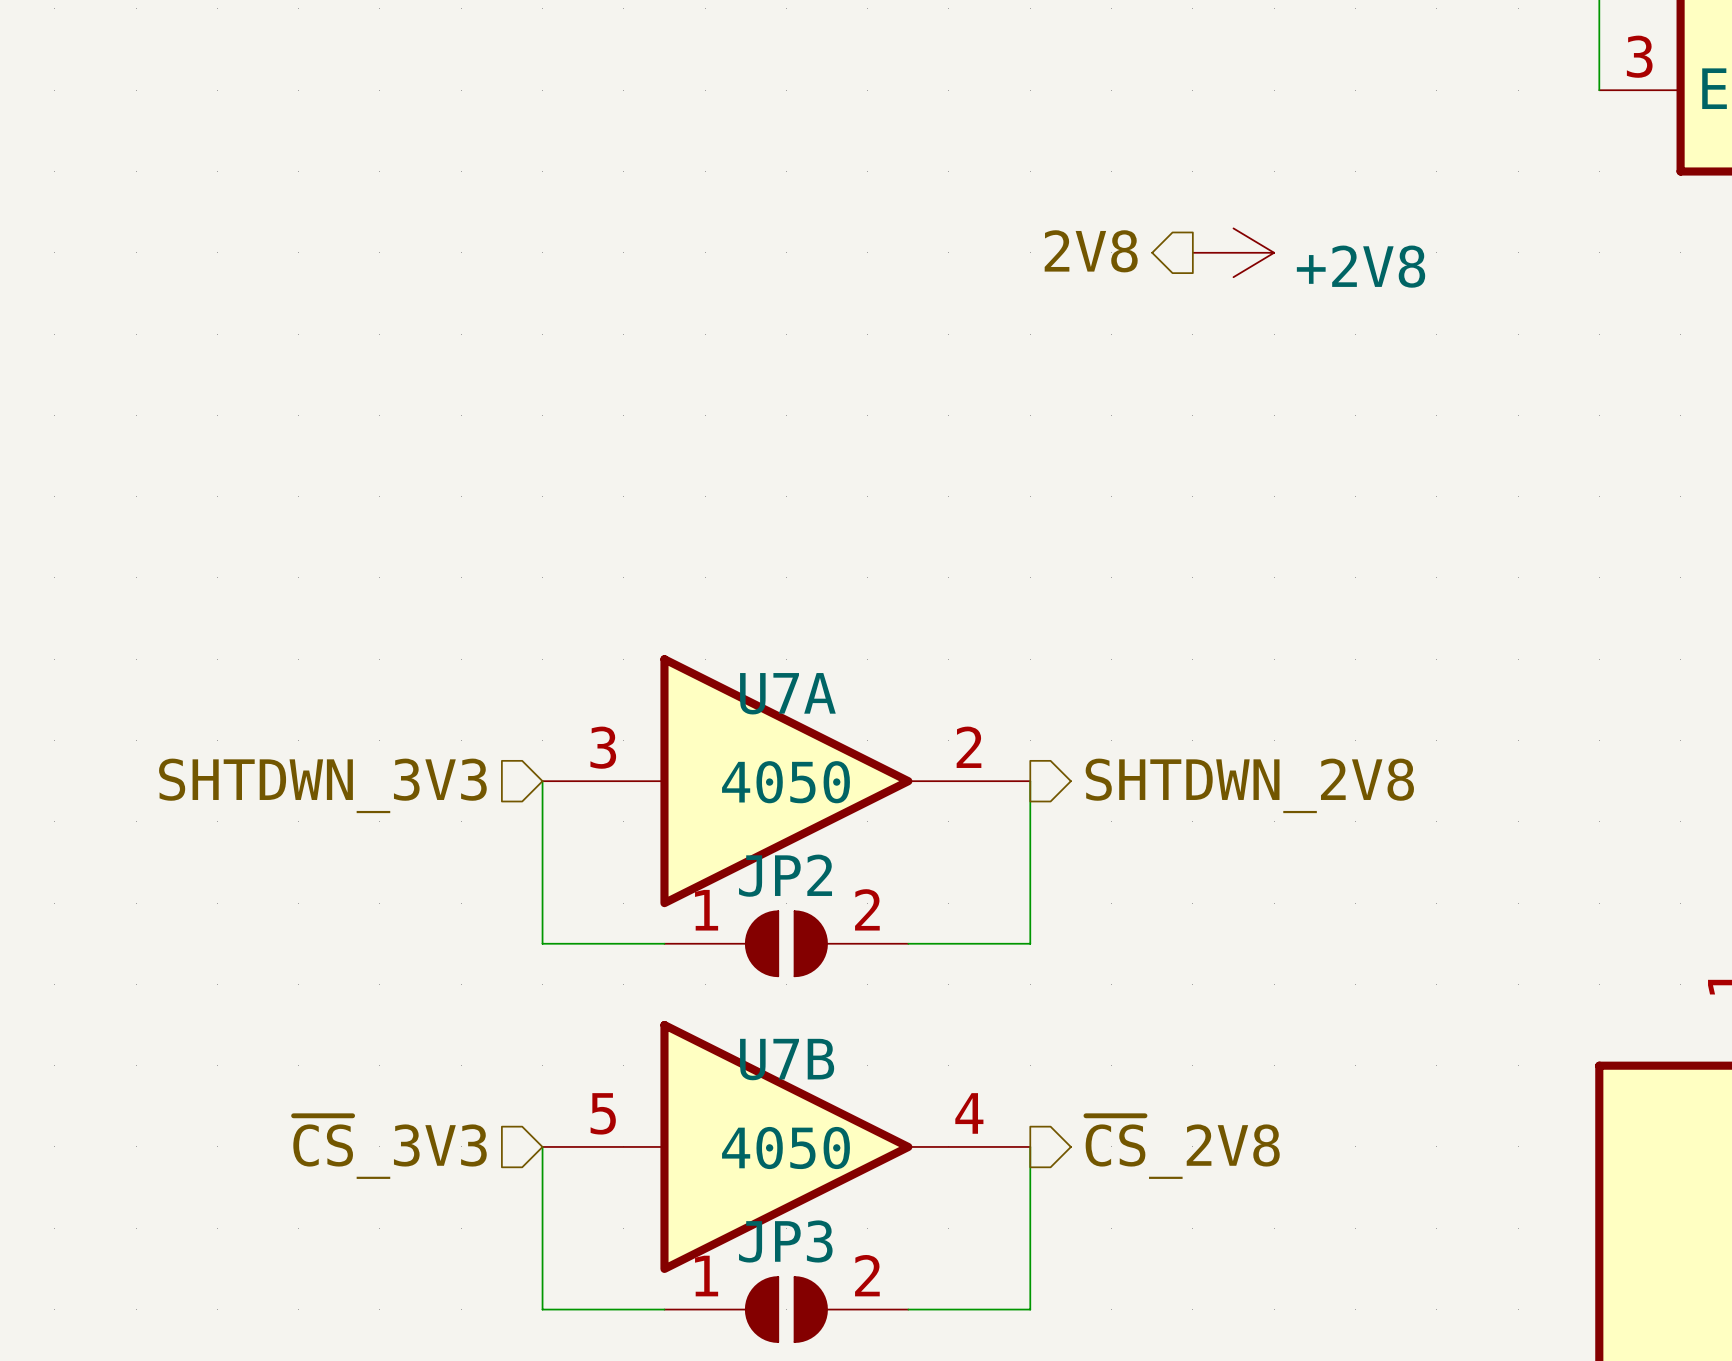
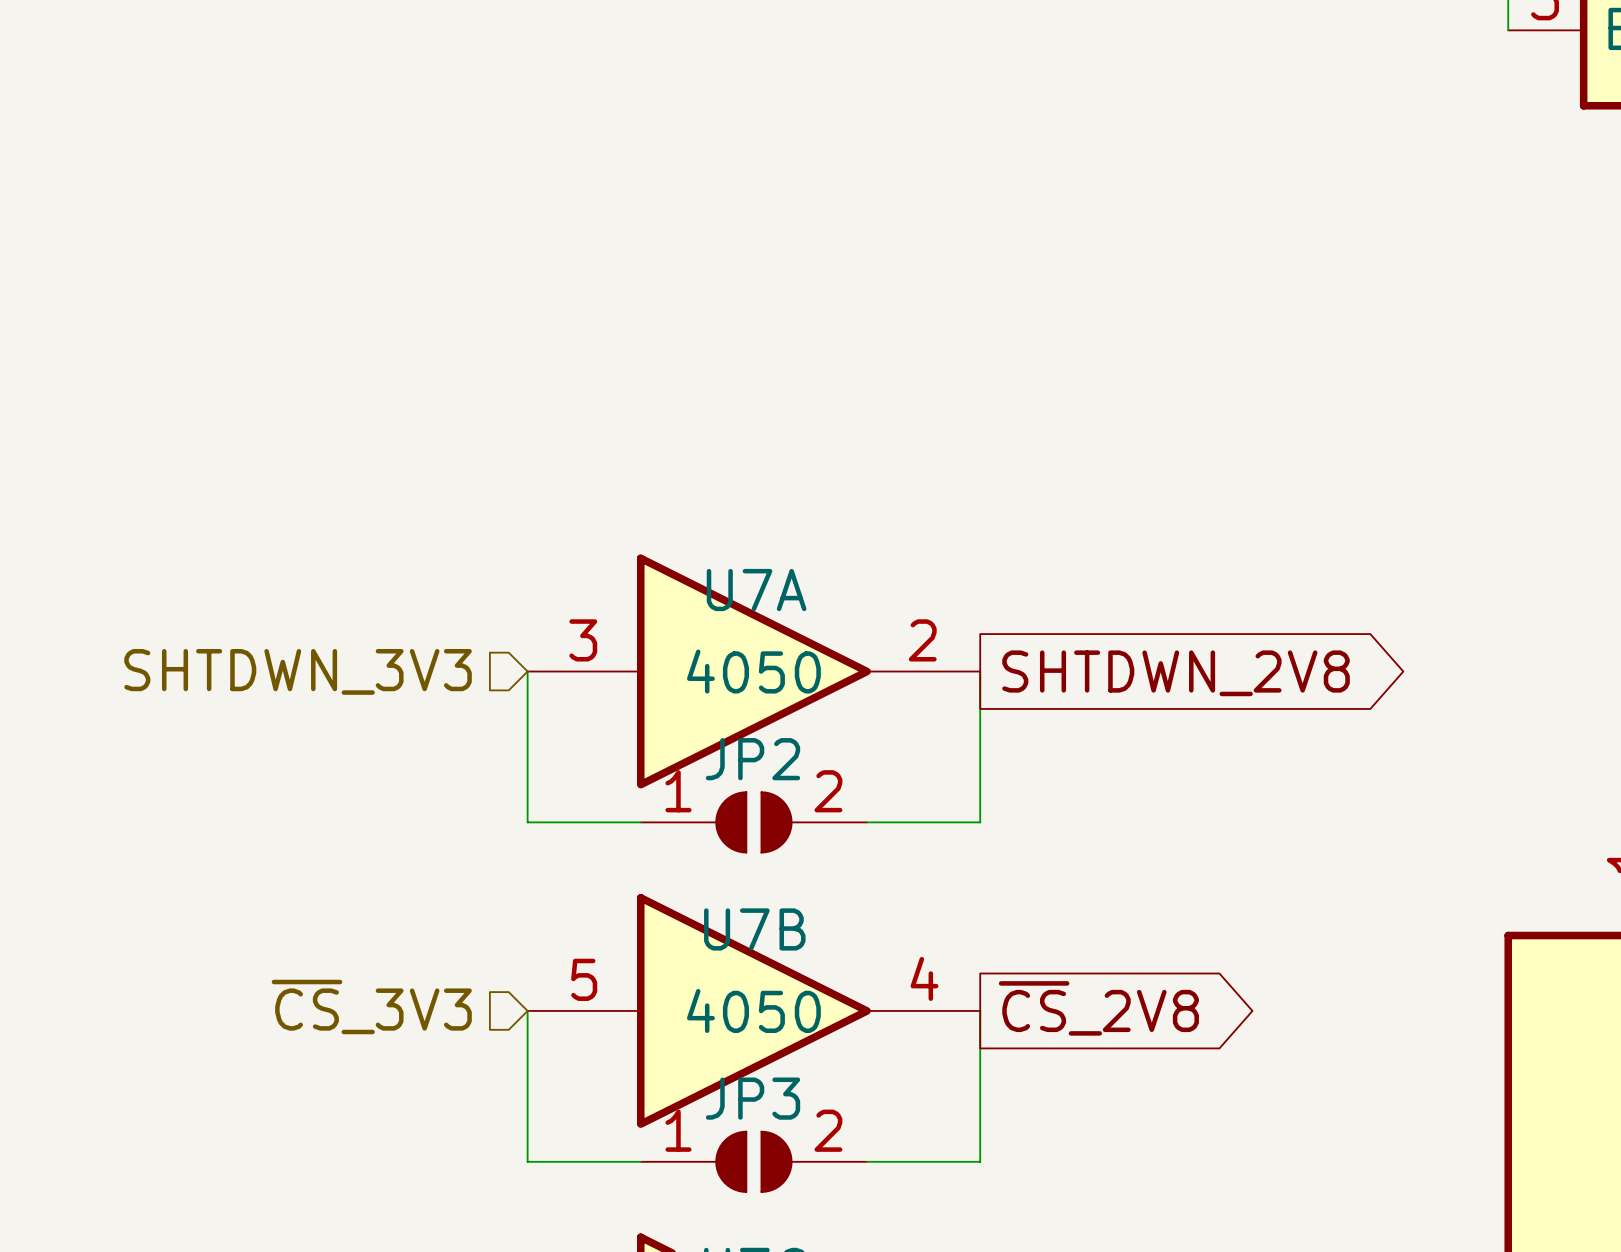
hierarchical label: 2V8 (1091, 251) -> none
power symbol: +2V8 (1233, 252) -> none
hierarchical label: SHTDWN_2V8 (1249, 785) -> none
global label: none -> SHTDWN_2V8 (1176, 673)
hierarchical label: ~{CS}_2V8 (1182, 1147) -> none
global label: none -> ~{CS}_2V8 (1098, 1008)

